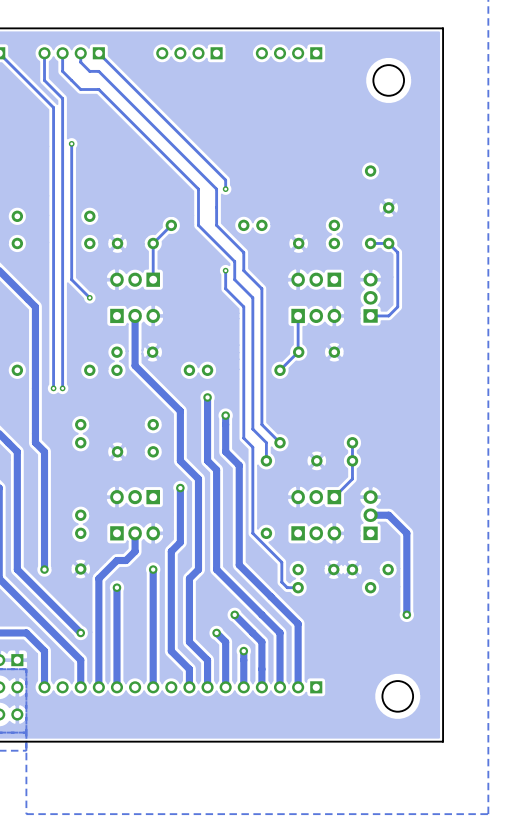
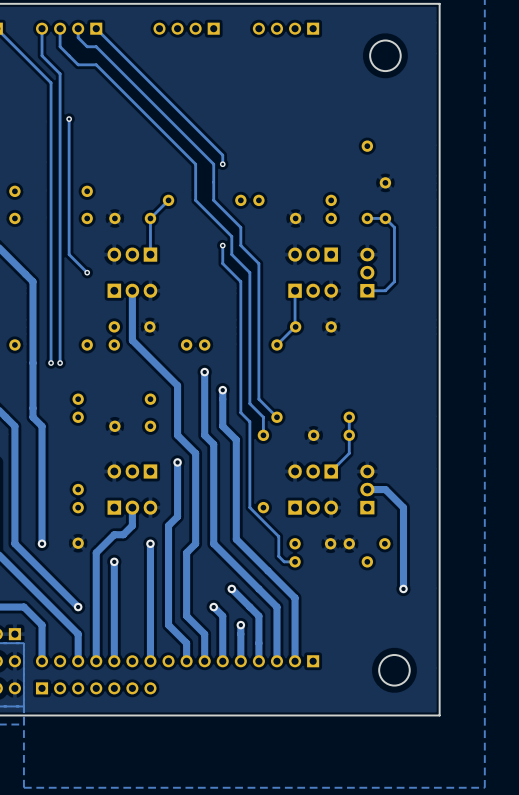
part: none -> (96, 688)

